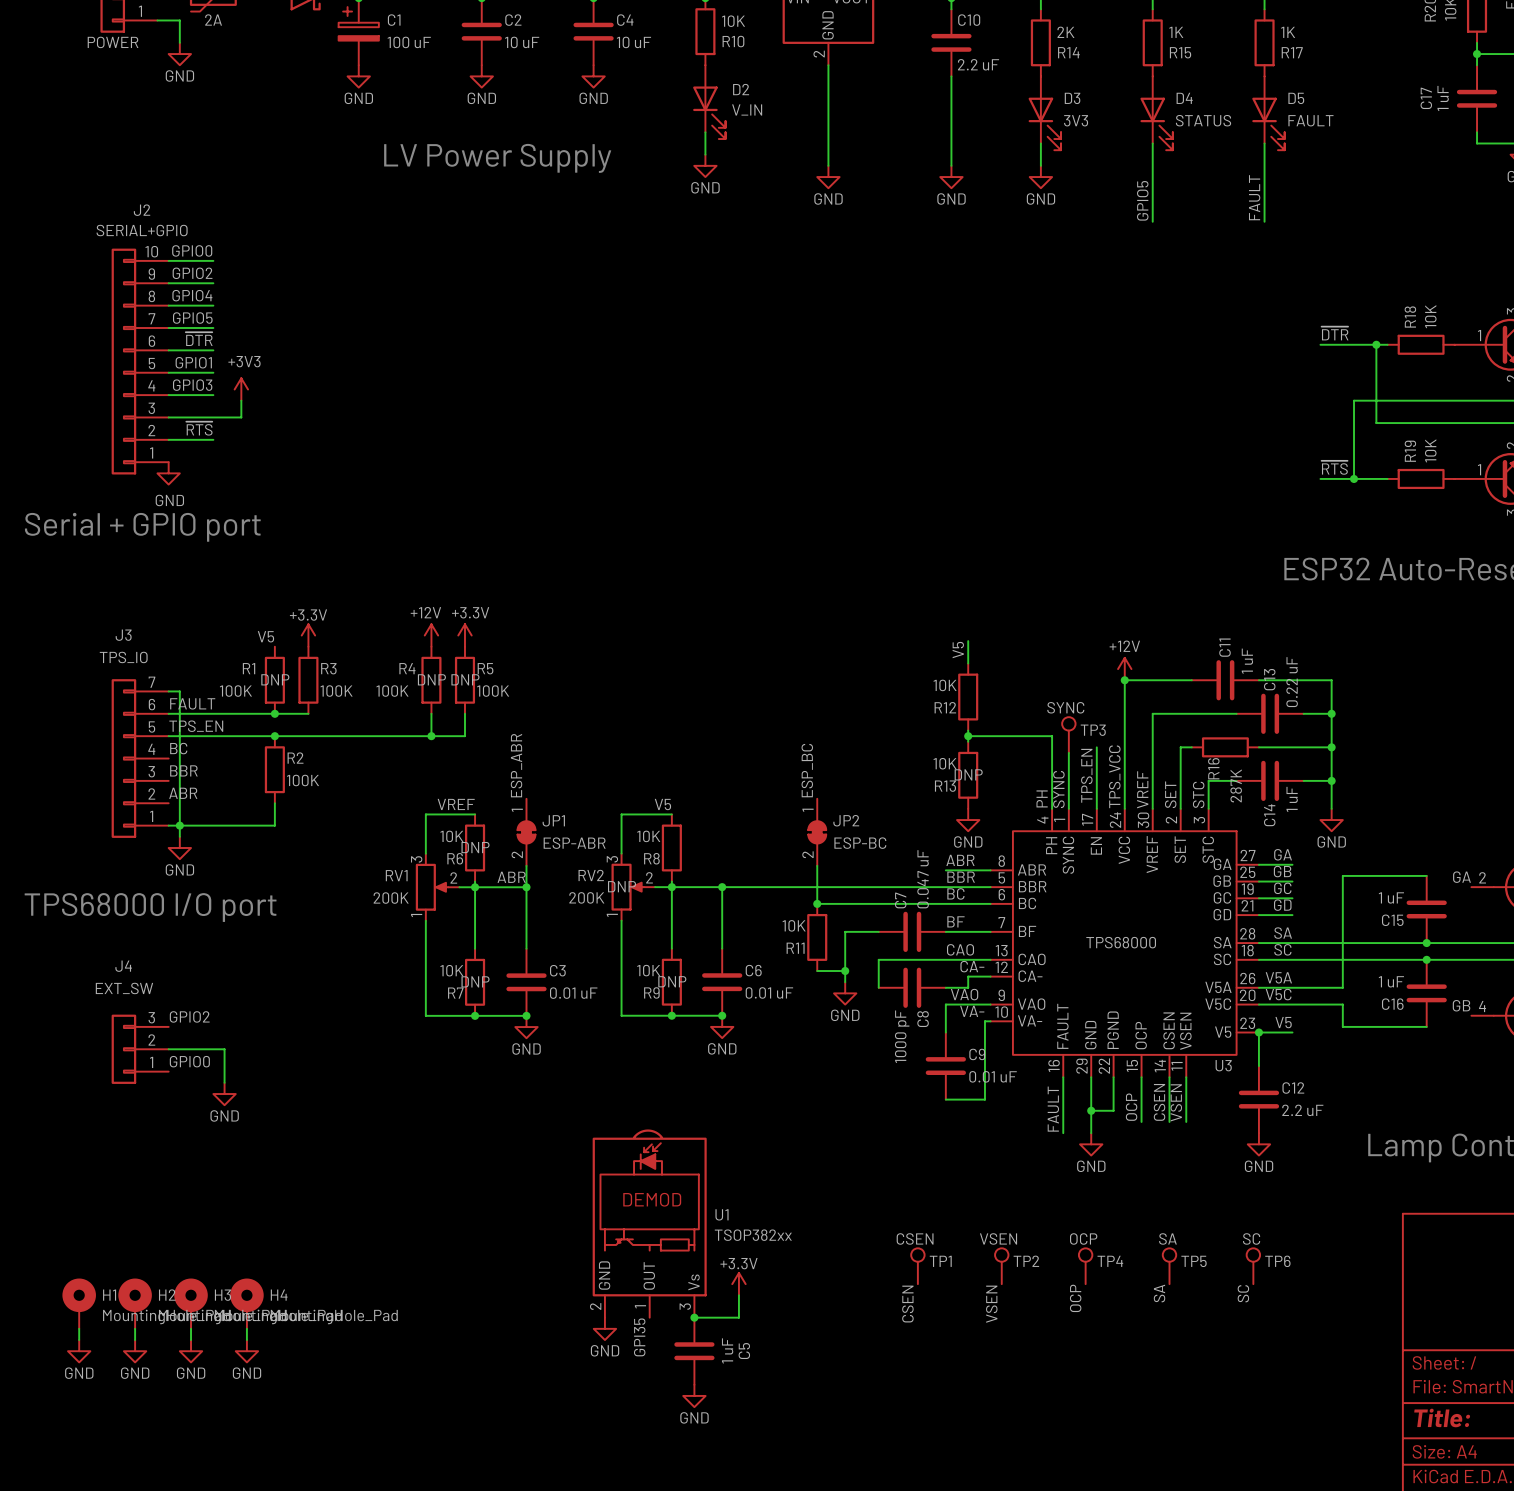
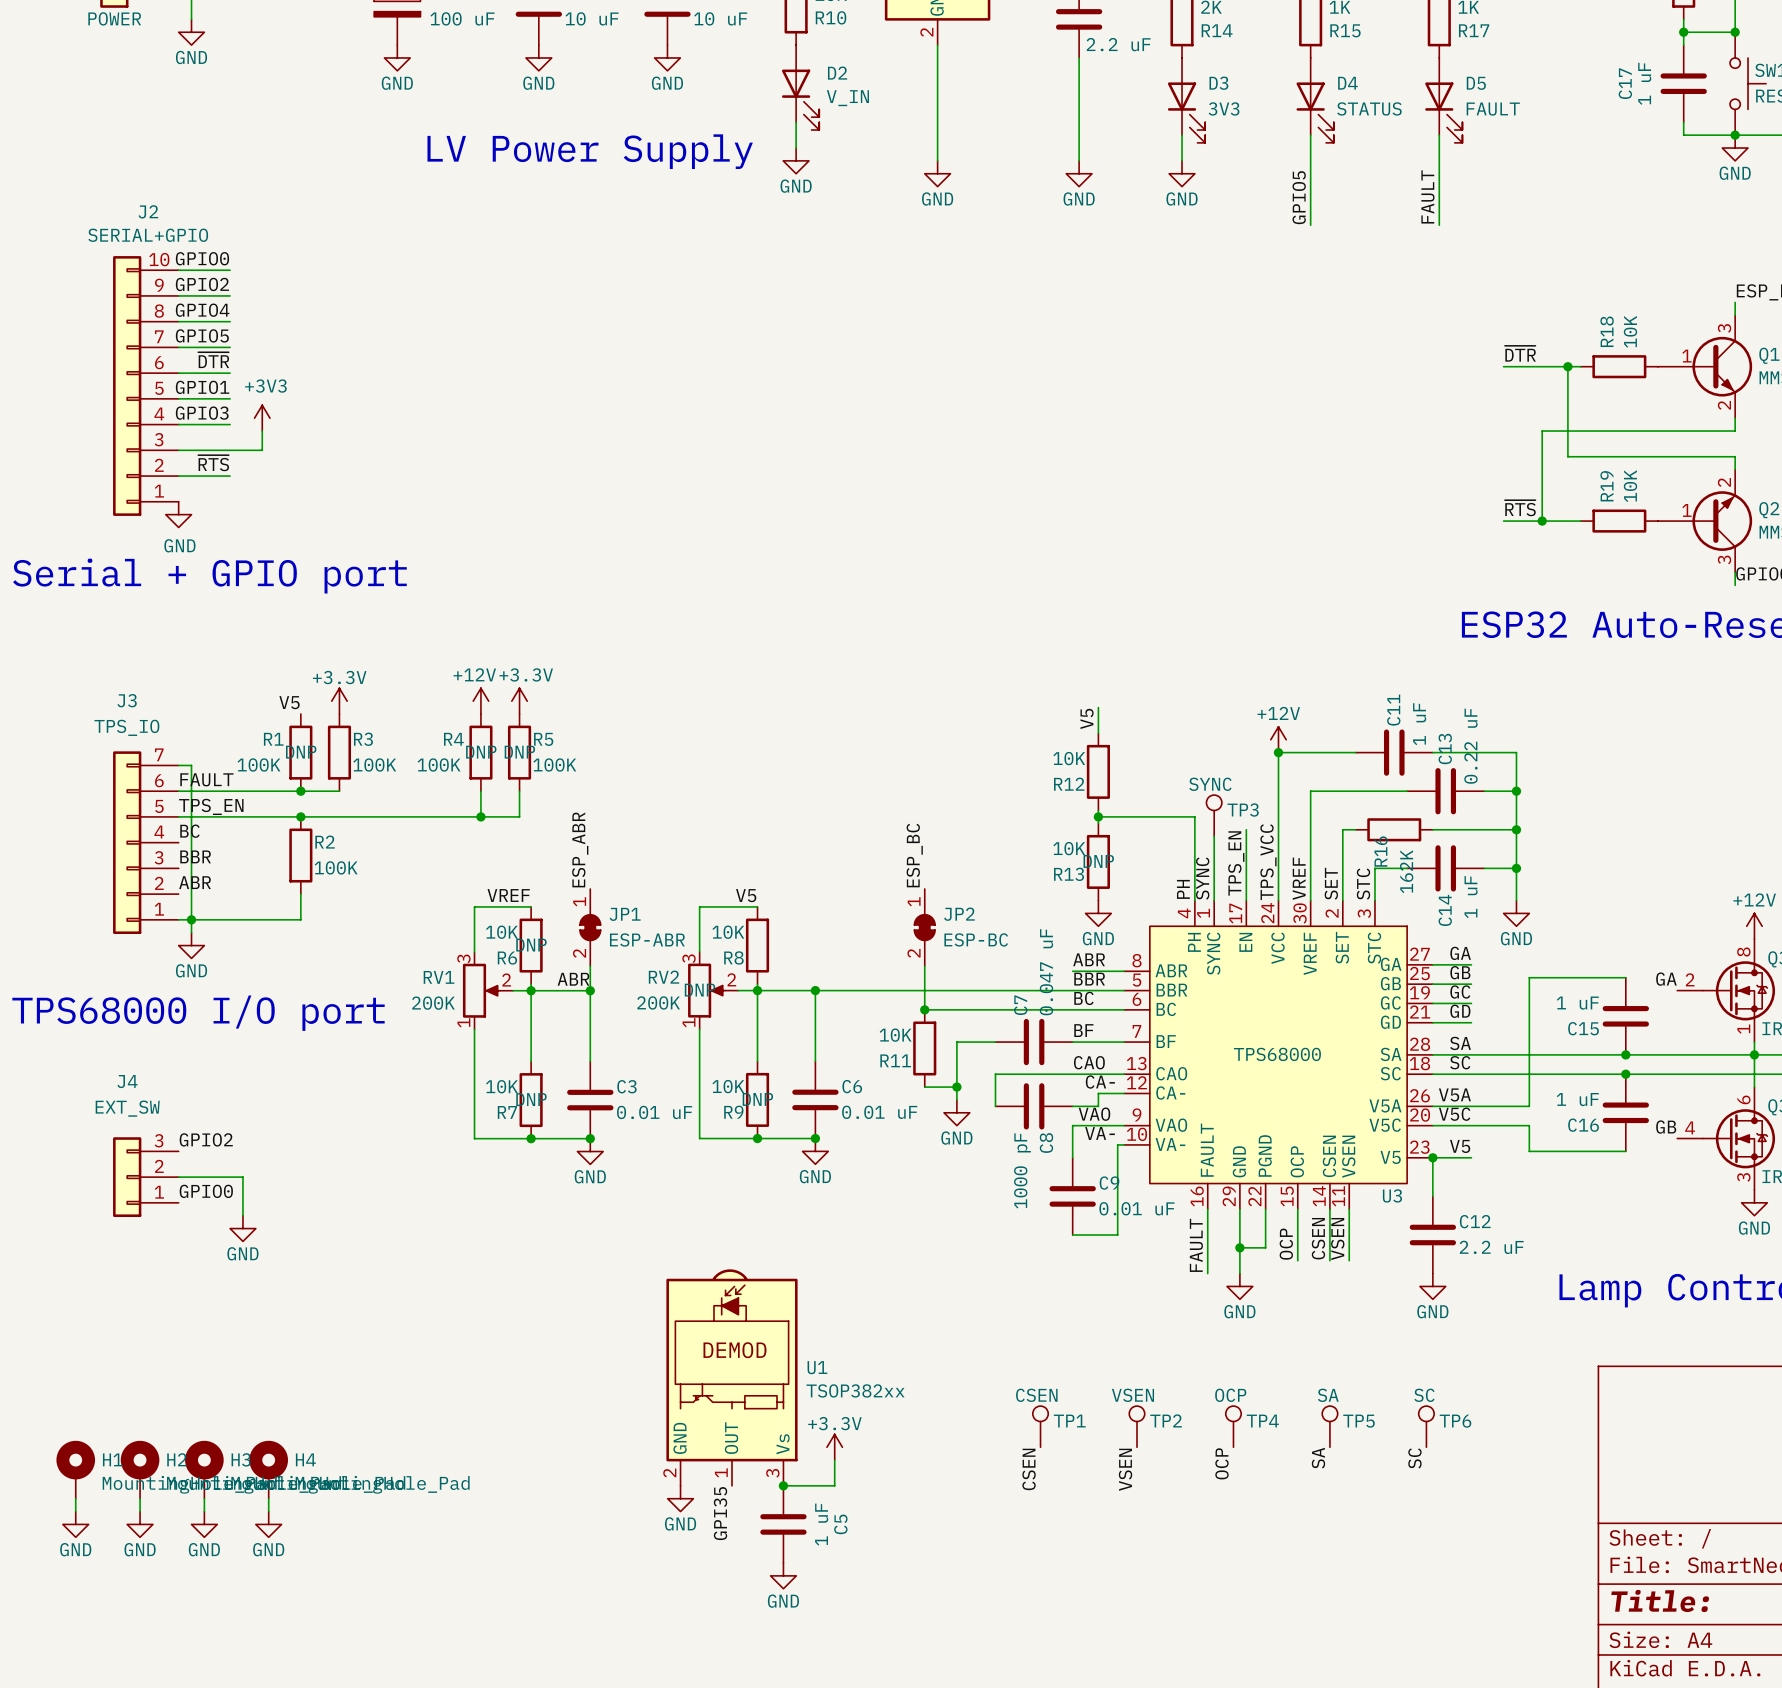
R16 value: 287K (1236, 785) -> 162K (1406, 871)

